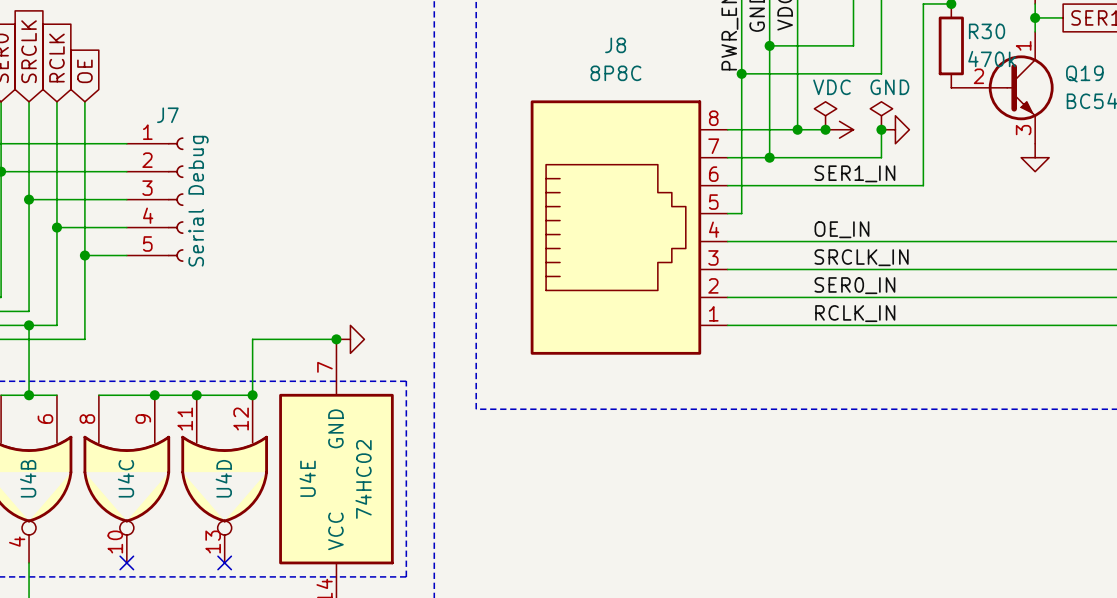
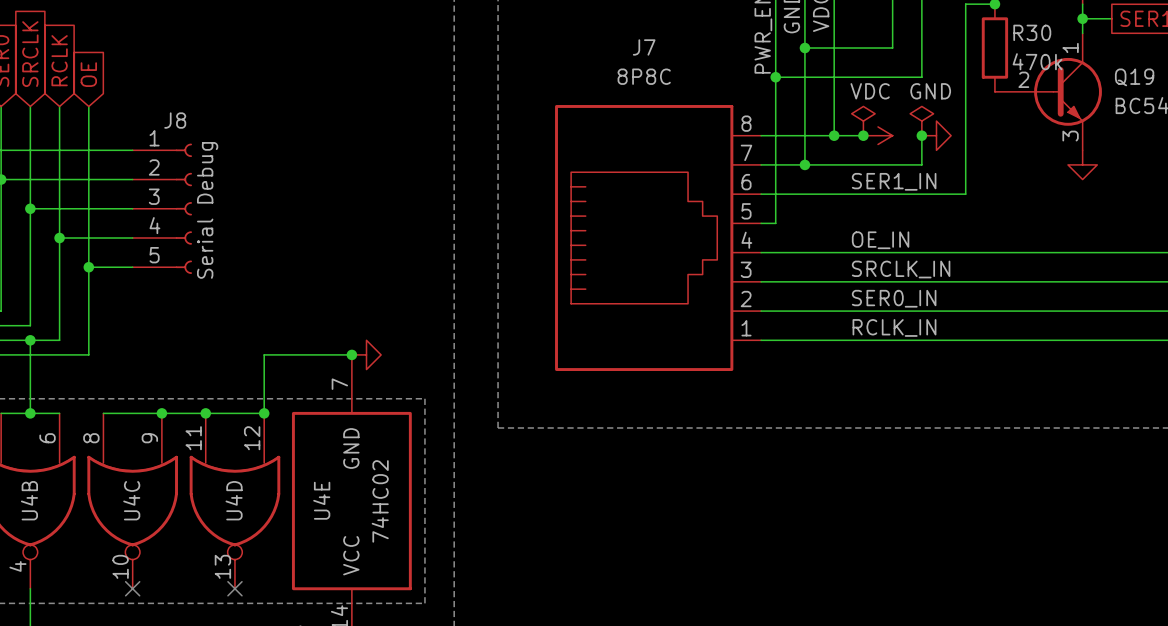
J8 name: J8 (615, 45) -> J7 (644, 47)
J7 name: J7 (167, 115) -> J8 (175, 120)

